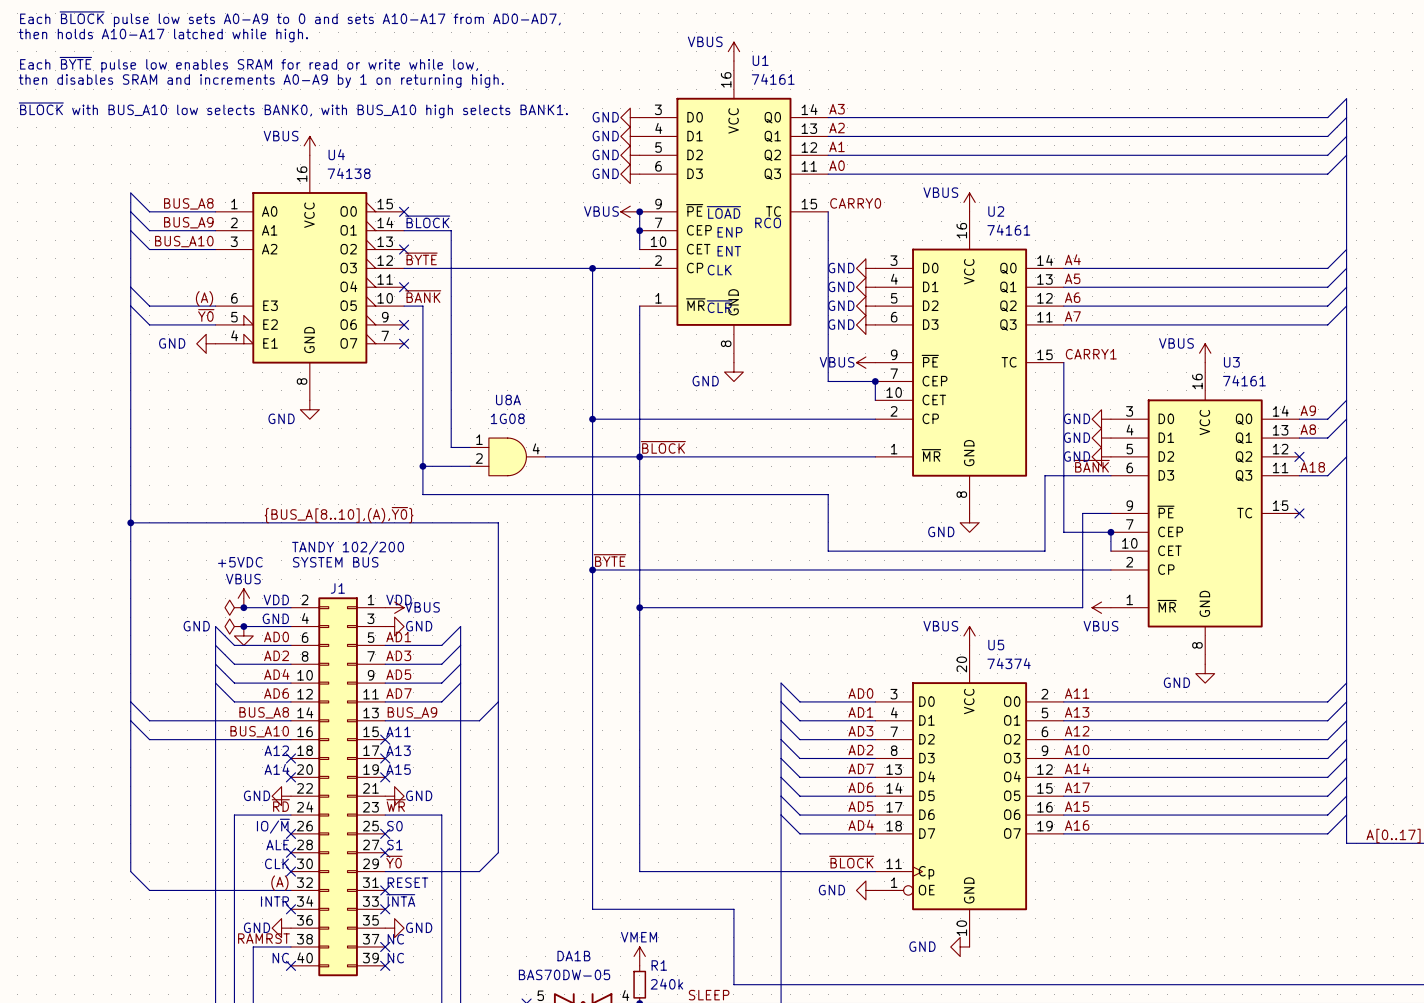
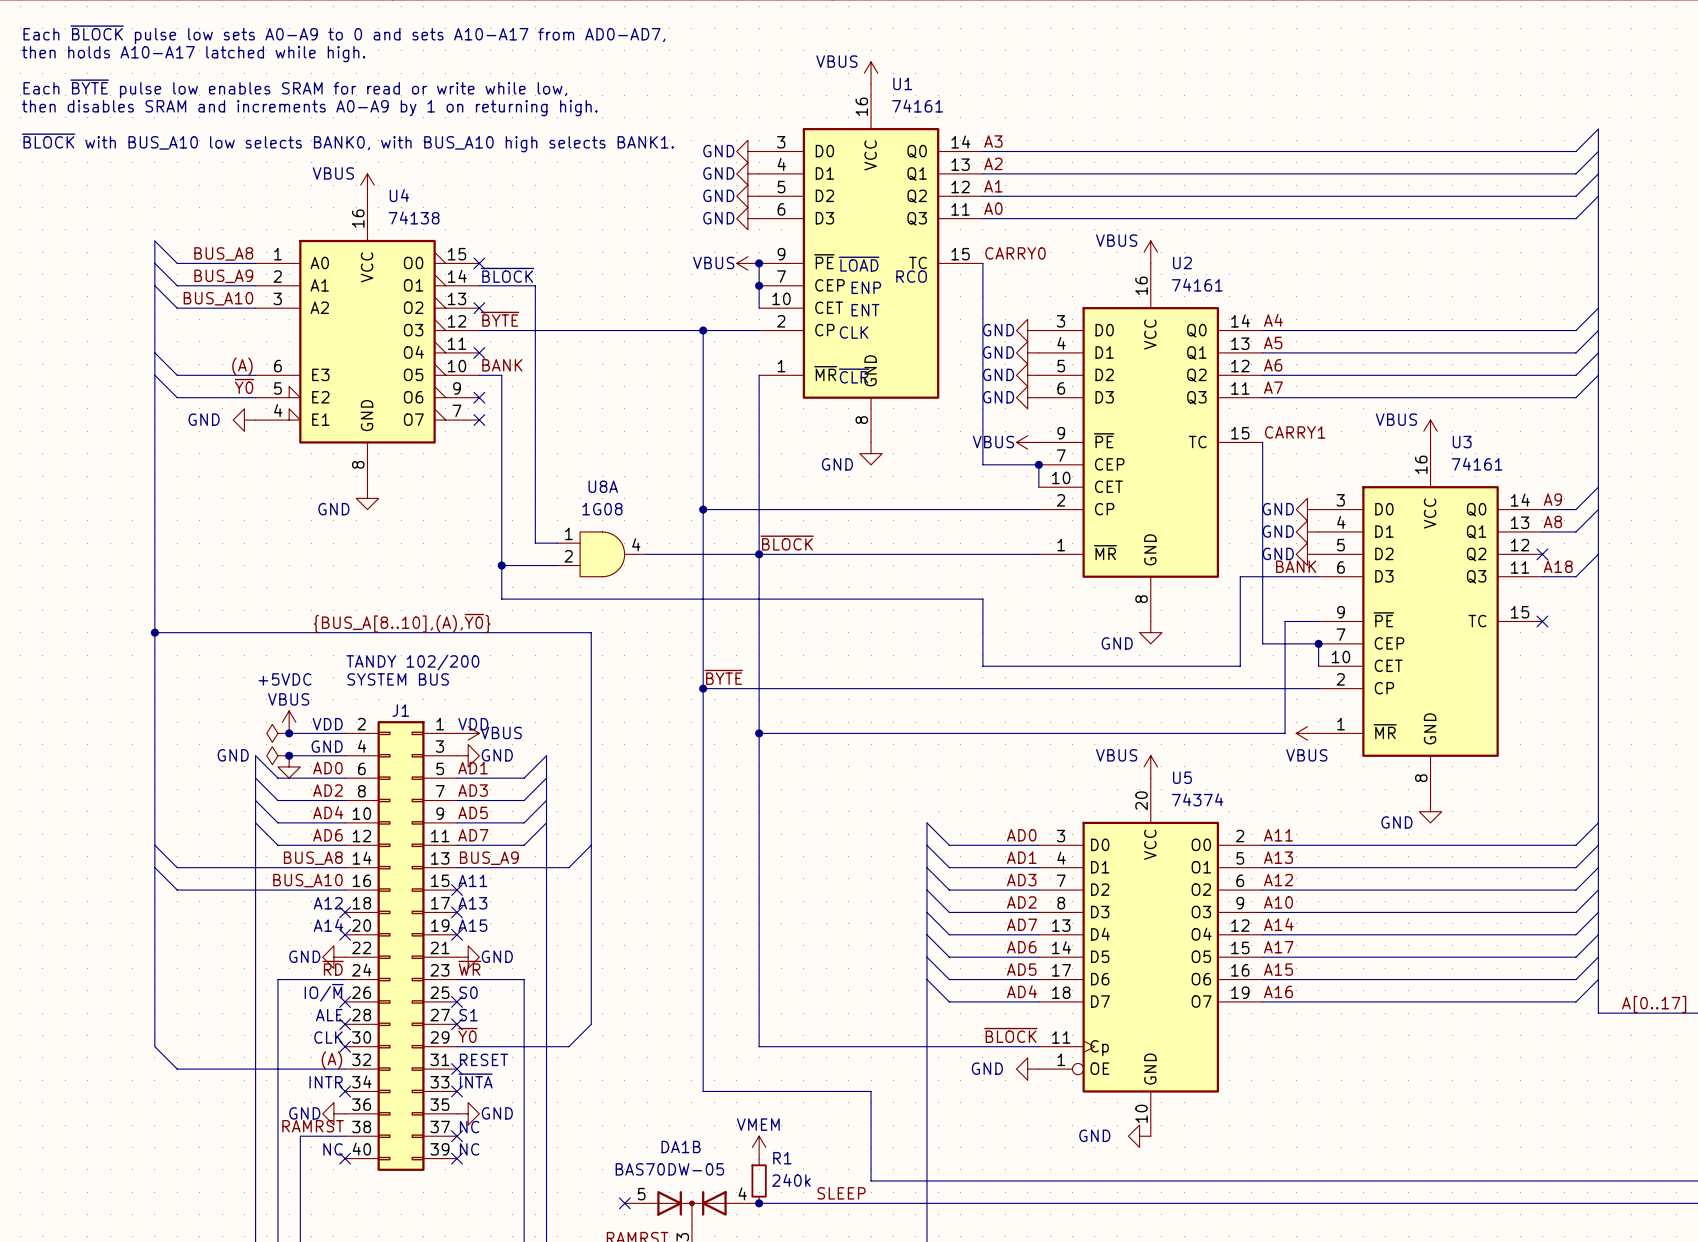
label: ~{BANK} (423, 296) -> BANK (502, 365)
label: ~{BANK} (1091, 466) -> BANK (1296, 566)

